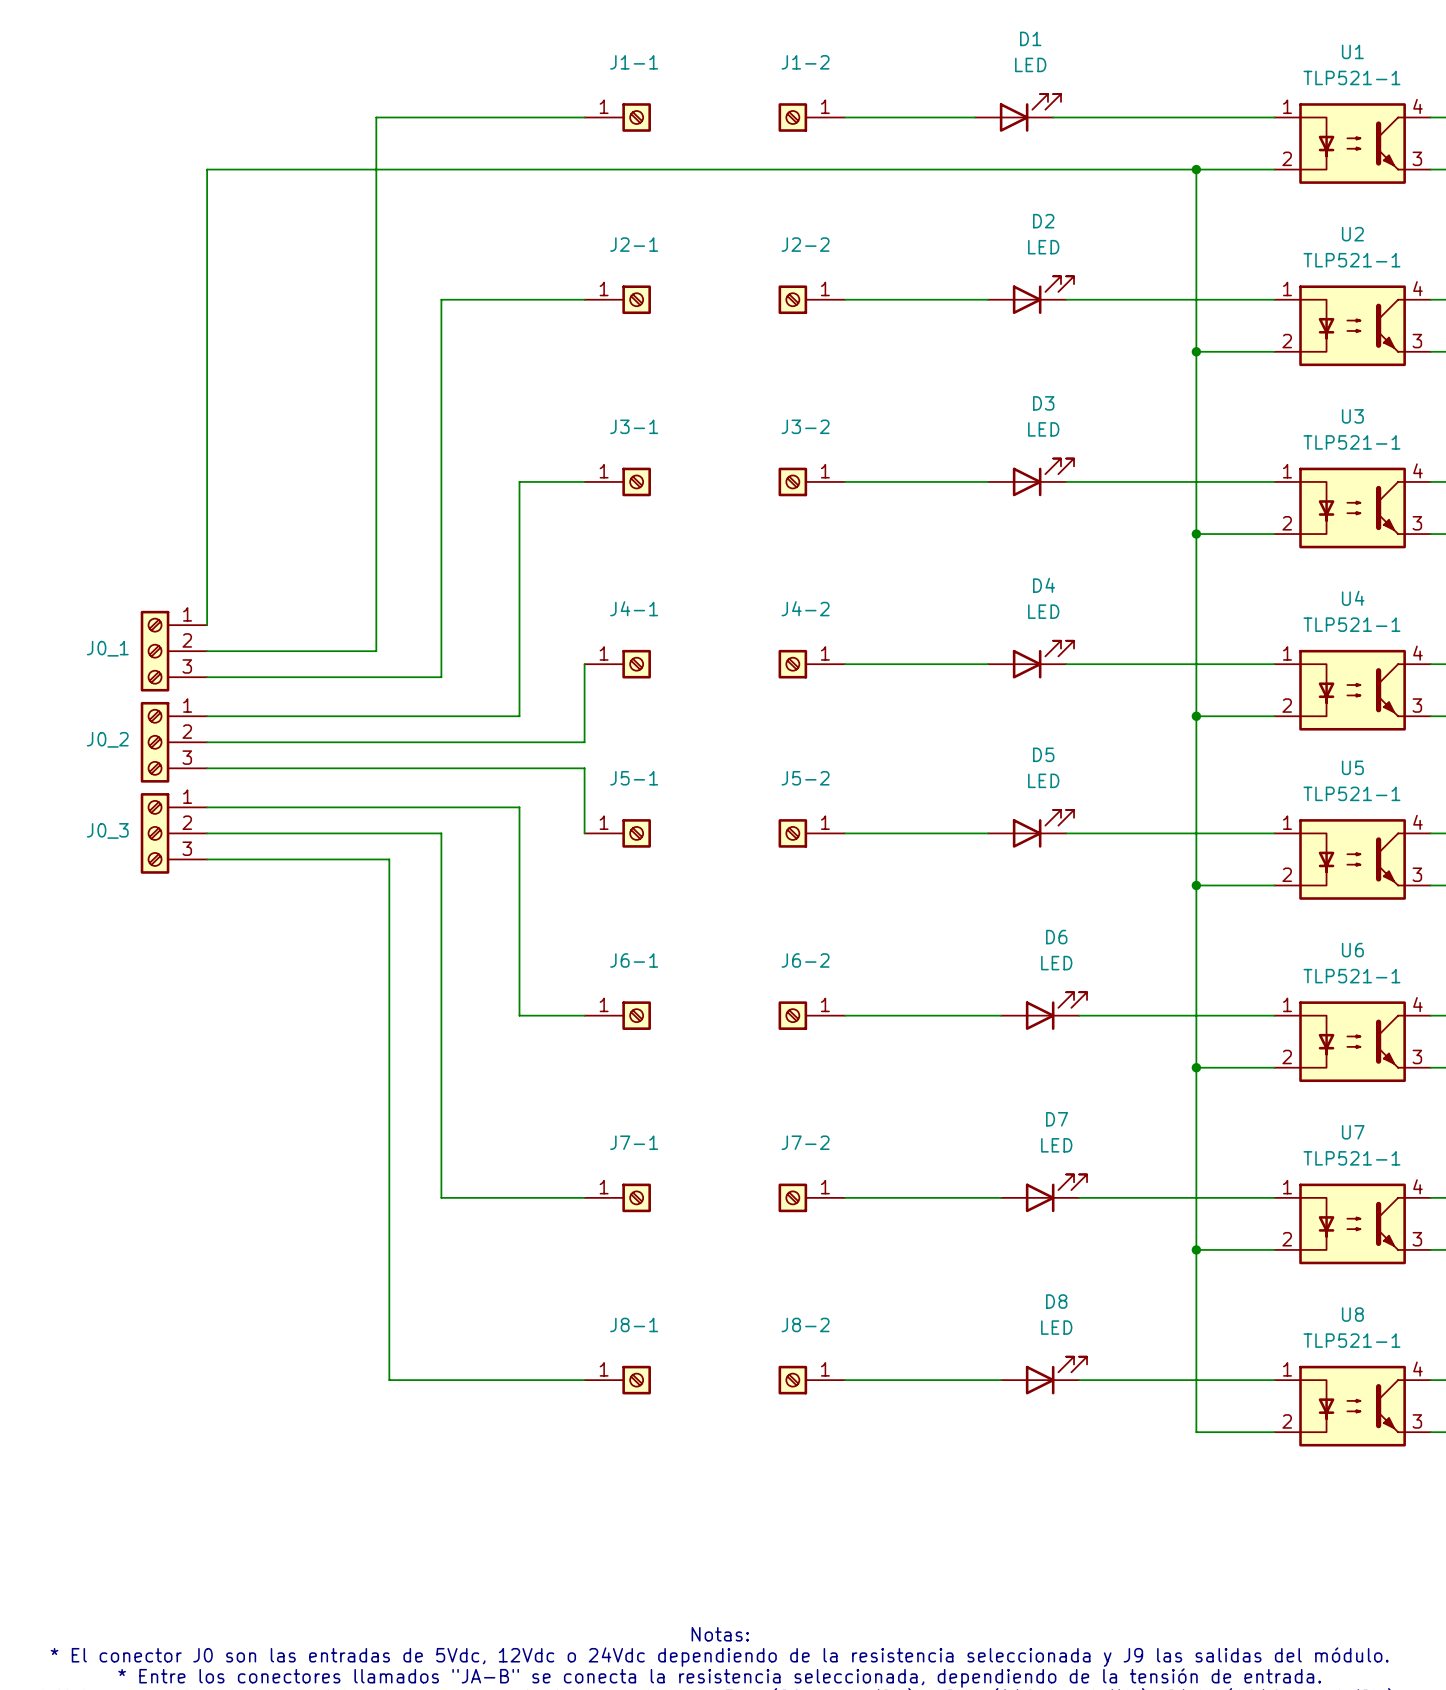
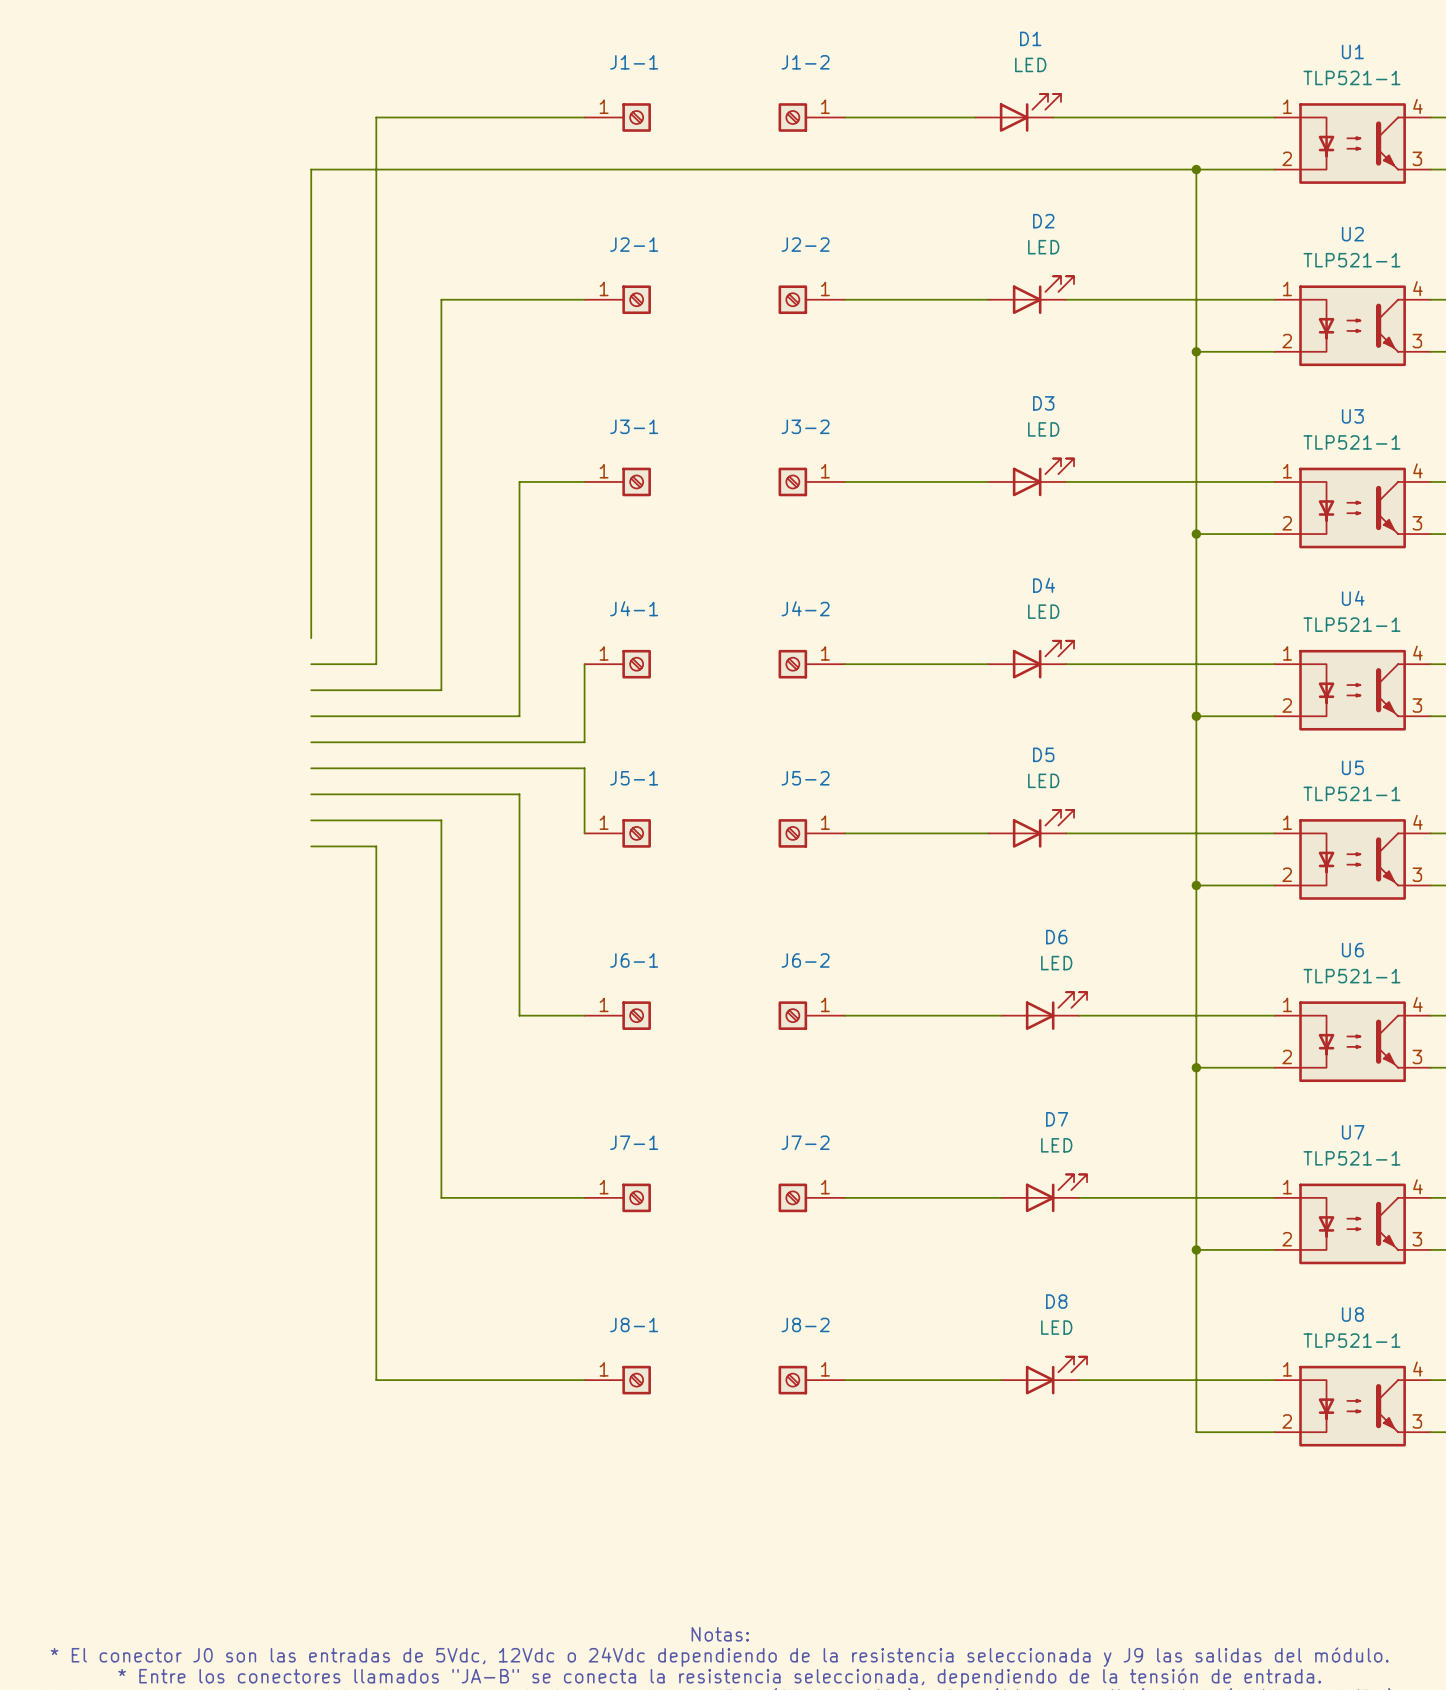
wire: (311, 169) (207, 169) (207, 625) -> (311, 169) (311, 638)
J0_1: (173, 651) -> none
wire: (207, 651) (376, 651) -> (311, 664) (376, 664) (376, 651)
wire: (207, 677) (441, 677) -> (311, 690) (441, 690) (441, 677)
wire: (207, 716) (311, 716) -> none
J0_2: (173, 742) -> none
wire: (207, 742) (311, 742) -> none
wire: (207, 768) (311, 768) -> none
wire: (207, 807) (519, 807) -> (311, 794) (519, 794) (519, 807)
J0_3: (173, 833) -> none
wire: (207, 833) (441, 833) -> (311, 820) (441, 820) (441, 833)
wire: (207, 859) (389, 859) (389, 1380) -> (311, 846) (376, 846) (376, 1380) (389, 1380)

